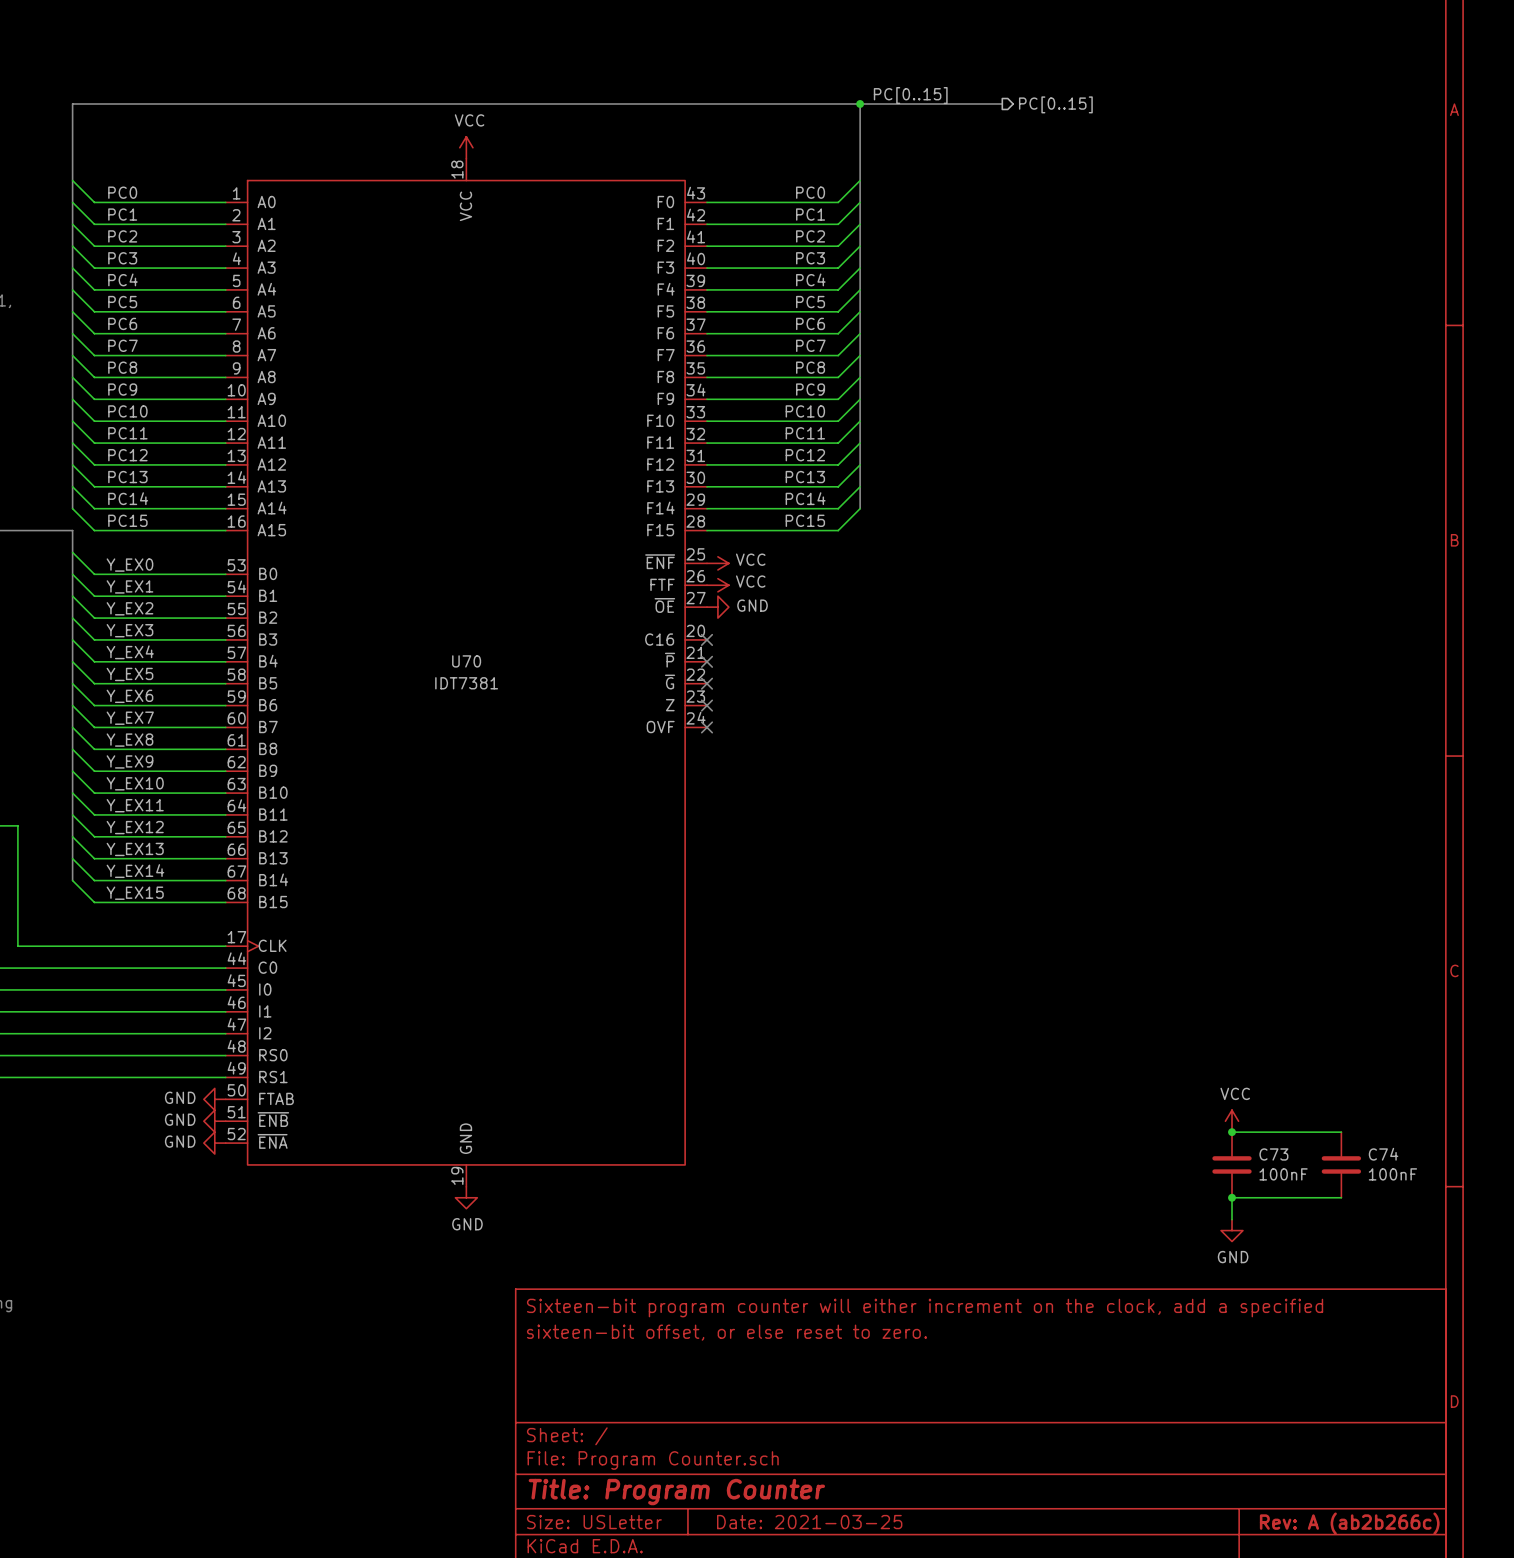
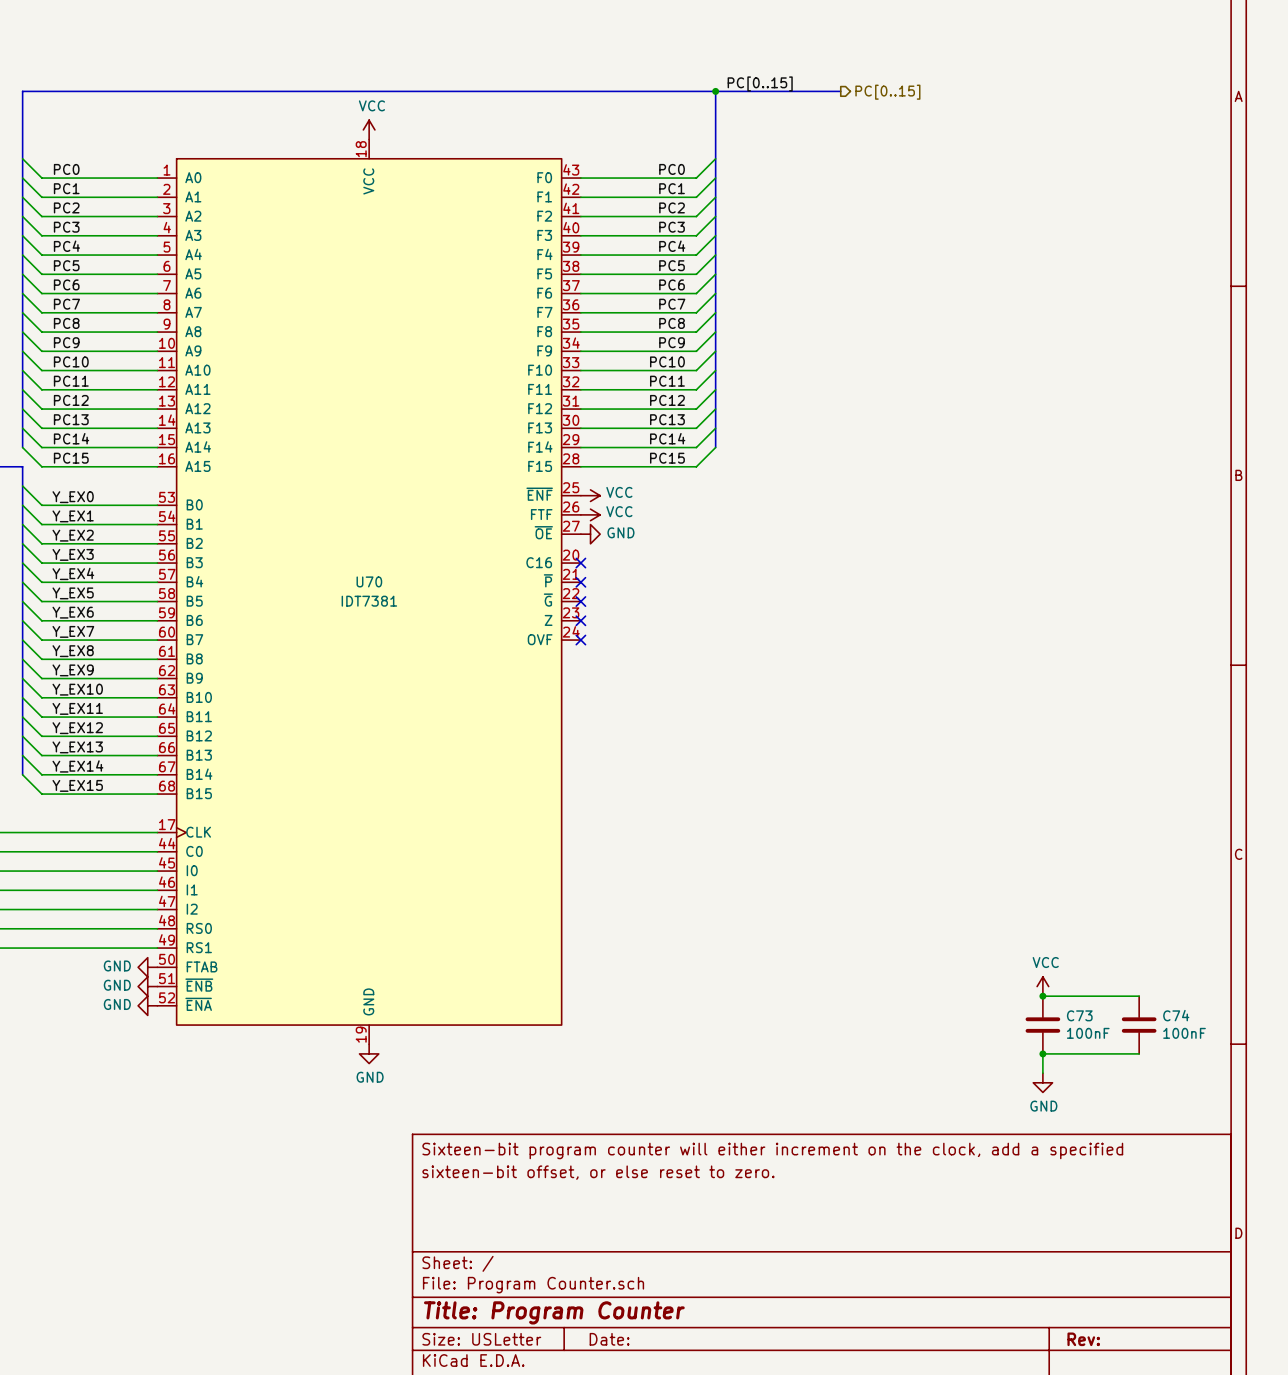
title block: Date: 2021-03-25 (809, 1522) -> Date: (609, 1339)
title block: Rev: A (ab2b266c) (1349, 1523) -> Rev: (1083, 1339)

